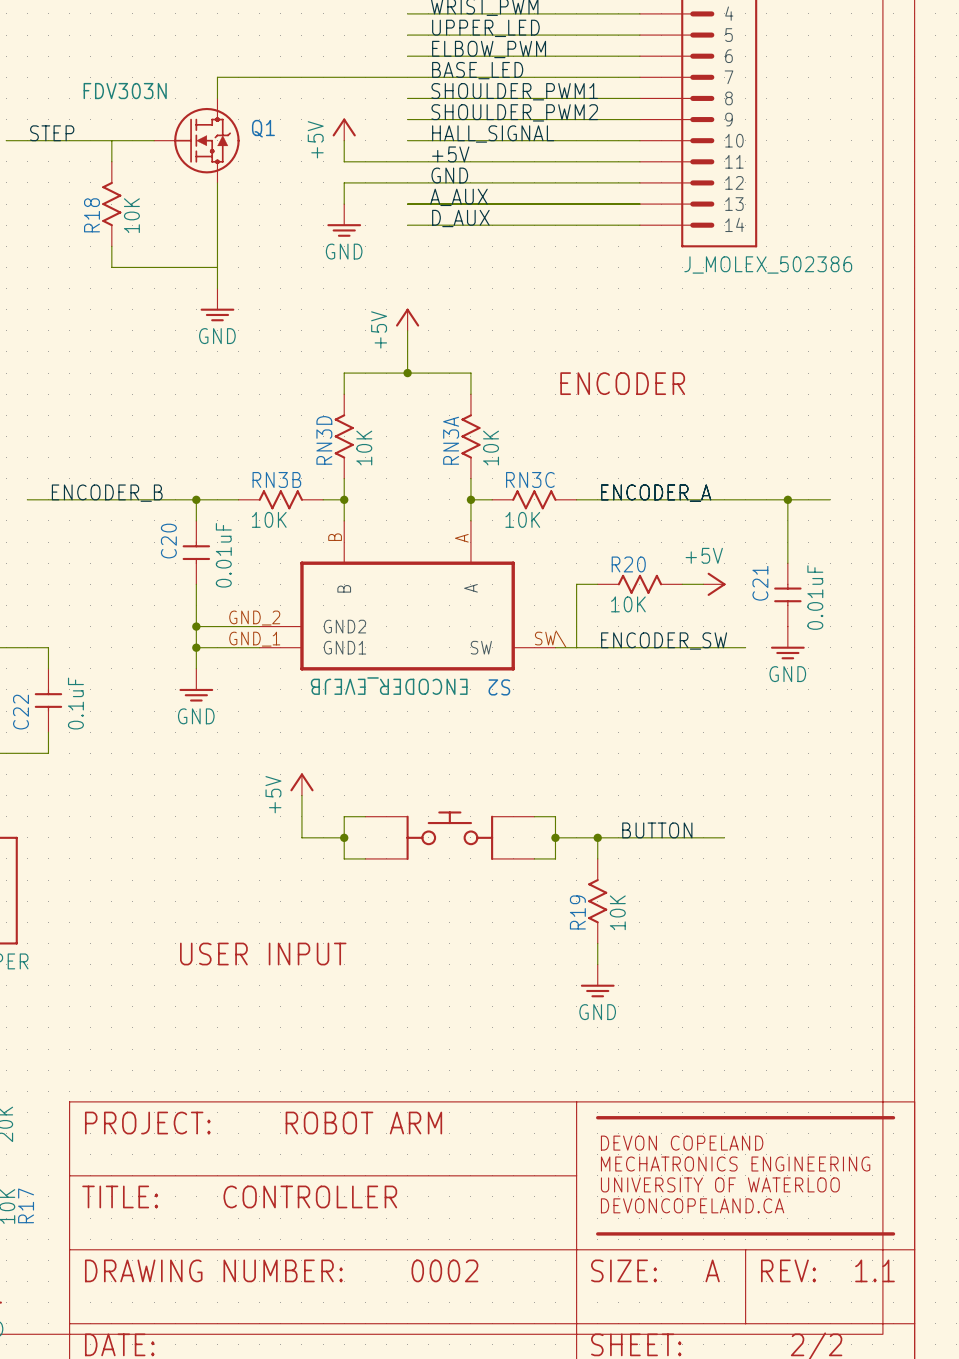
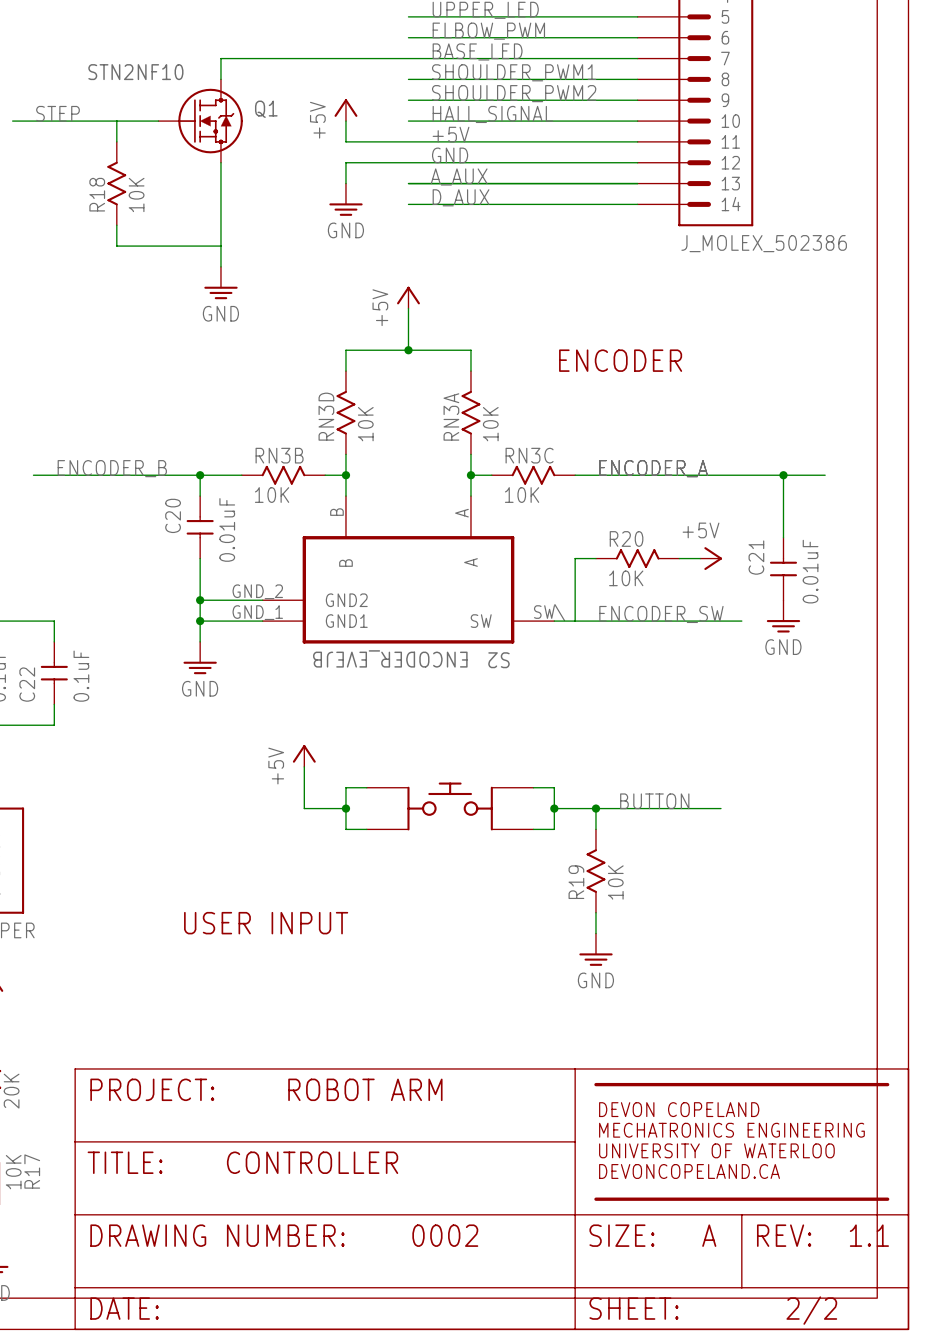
Q1 value: FDV303N (125, 91) -> STN2NF10 (135, 72)

